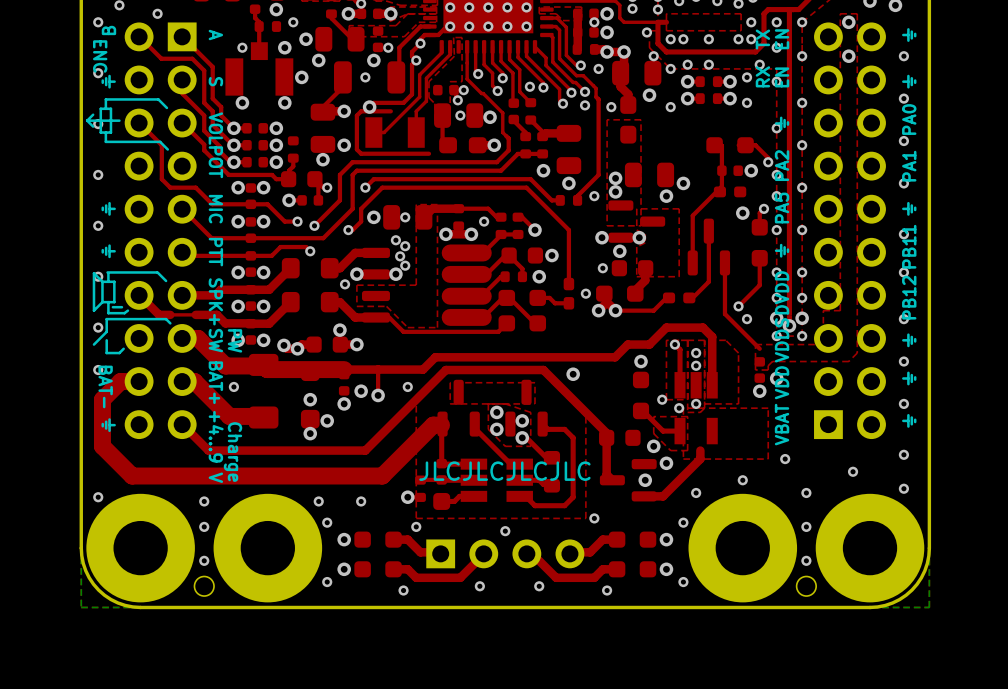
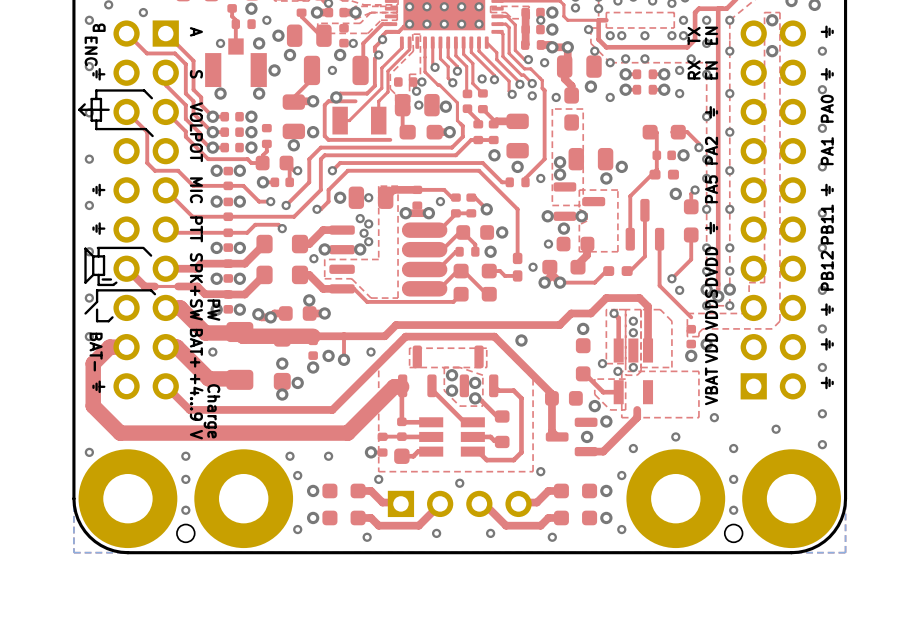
text: JLCJLCJLCJLC (504, 471) -> none

